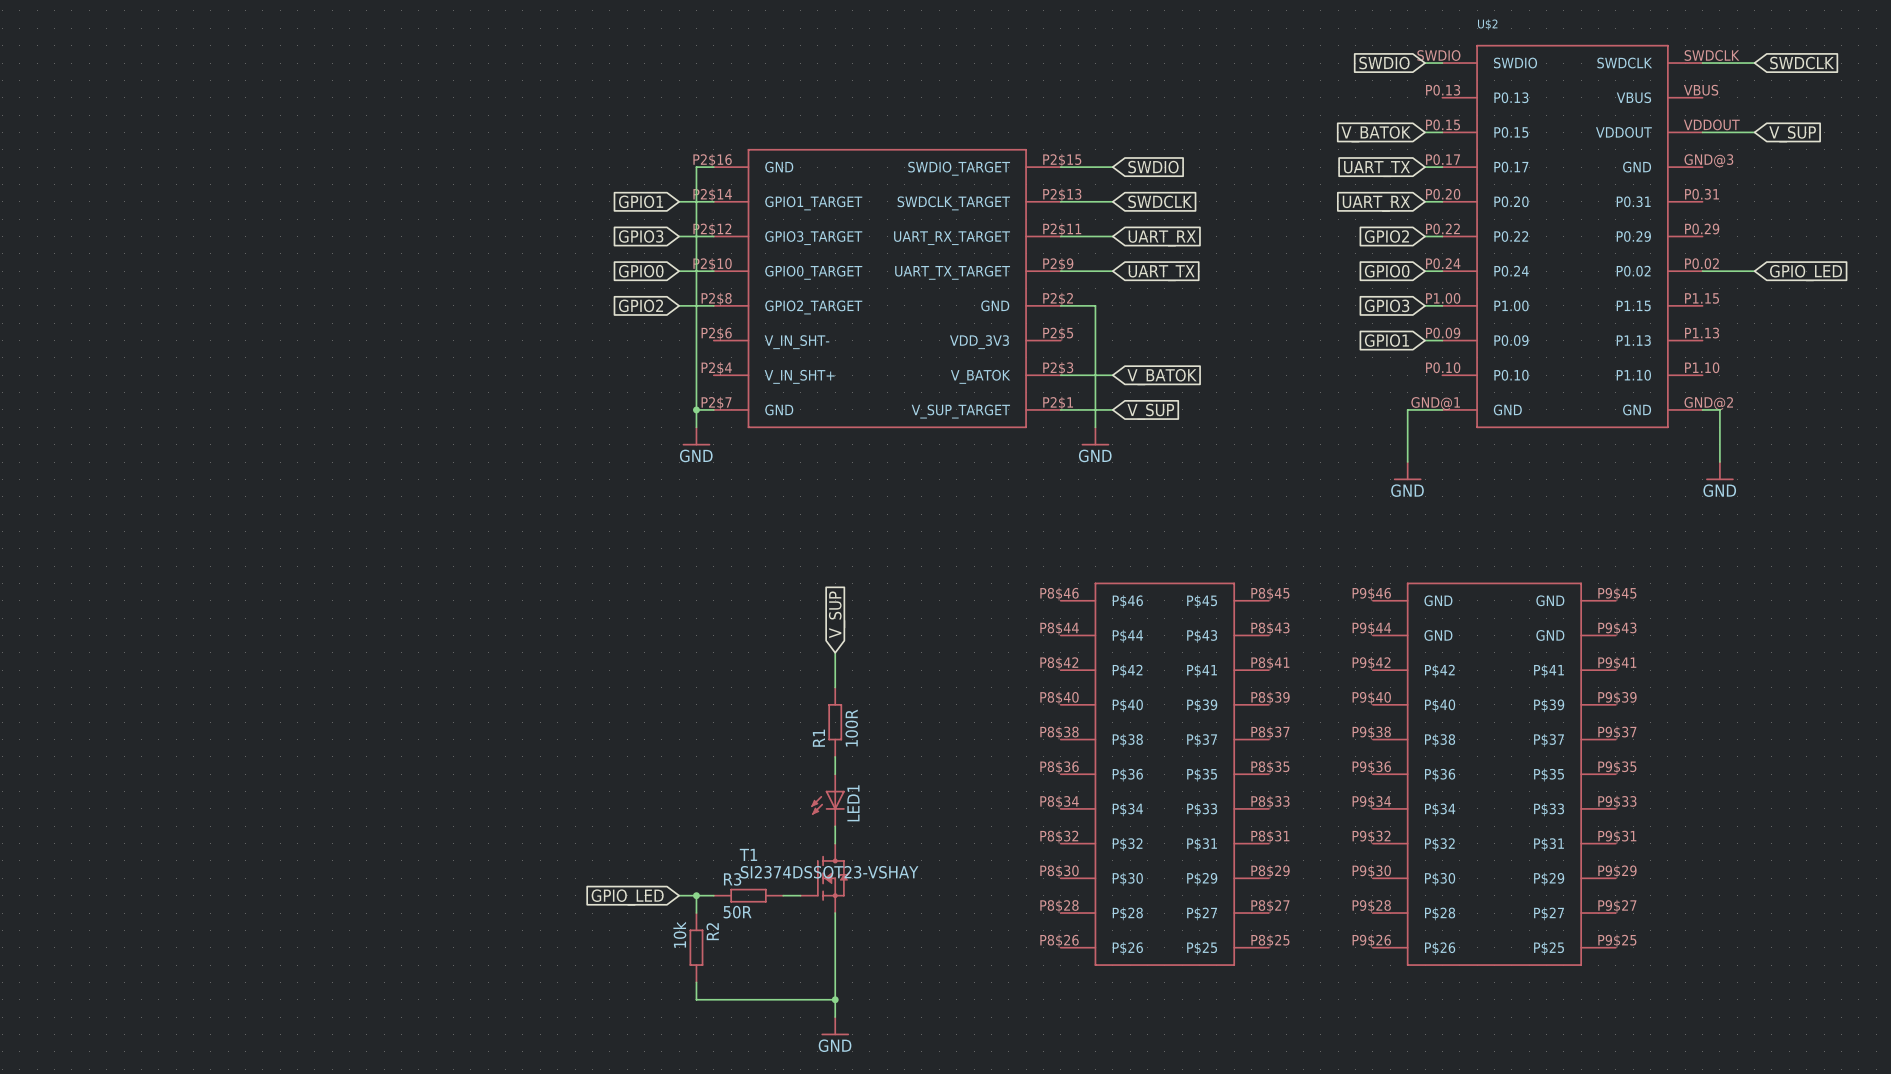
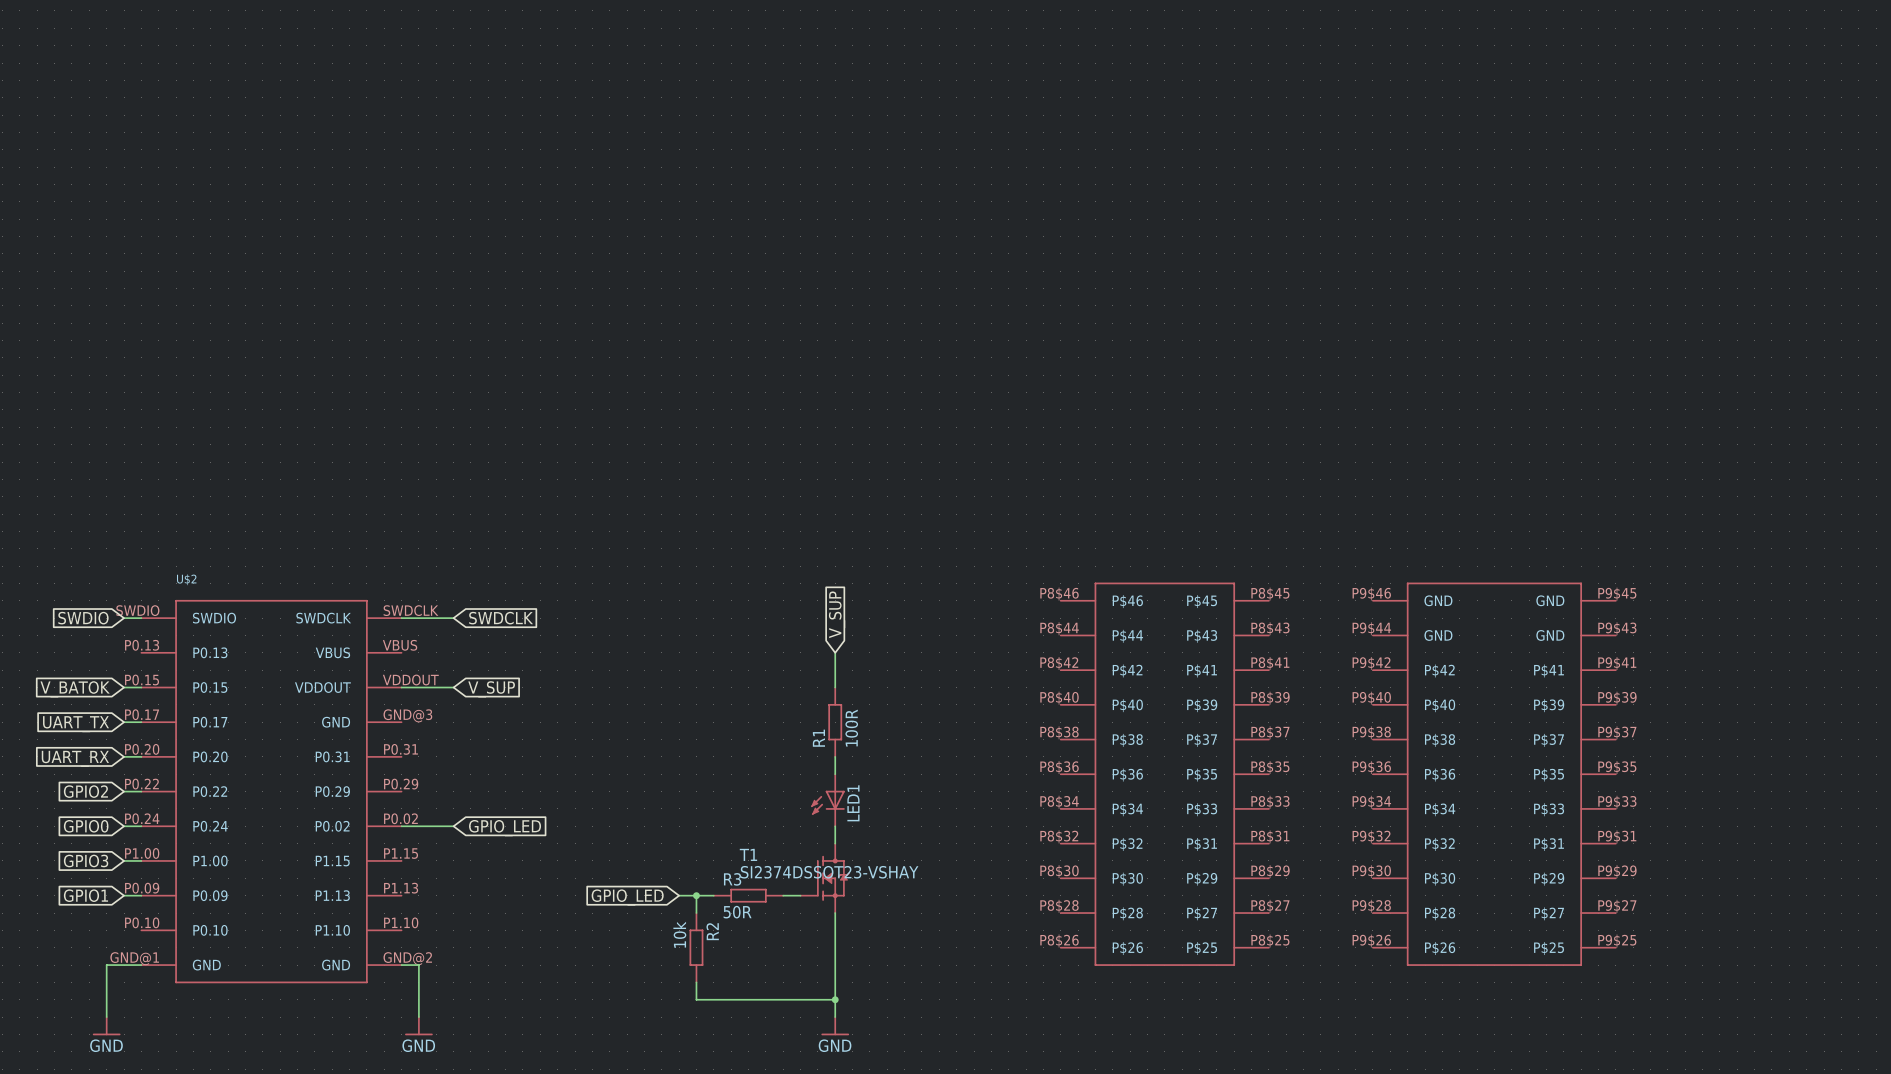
global label: SWDIO (1384, 63) -> none
wire: (1425, 63) (1442, 63) -> none
wire: (1702, 63) (1754, 63) -> none
global label: SWDCLK (1802, 63) -> none
wire: (1425, 132) (1442, 132) -> none
wire: (1702, 132) (1754, 132) -> none
global label: V_BATOK (1376, 134) -> none
global label: V_SUP (1792, 134) -> none
wire: (713, 167) (696, 167) (696, 427) -> none
wire: (1060, 167) (1112, 167) -> none
global label: SWDIO (1153, 167) -> none
wire: (1425, 167) (1442, 167) -> none
global label: UART_TX (1377, 169) -> none
global label: GPIO1 (641, 201) -> none
wire: (679, 201) (713, 201) -> none
wire: (1060, 201) (1112, 201) -> none
global label: SWDCLK (1160, 201) -> none
wire: (1425, 201) (1442, 201) -> none
global label: UART_RX (1376, 203) -> none
global label: GPIO3 (641, 236) -> none
wire: (679, 236) (713, 236) -> none
wire: (1060, 236) (1112, 236) -> none
global label: GPIO2 (1386, 236) -> none
wire: (1425, 236) (1442, 236) -> none
U$2 position: (1572, 236) -> (271, 791)
global label: UART_RX (1162, 238) -> none
global label: GPIO0 (641, 271) -> none
wire: (679, 271) (713, 271) -> none
wire: (1060, 271) (1112, 271) -> none
global label: GPIO0 (1387, 271) -> none
wire: (1425, 271) (1442, 271) -> none
wire: (1702, 271) (1754, 271) -> none
global label: UART_TX (1161, 273) -> none
global label: GPIO_LED (1806, 273) -> none
part: (887, 288) -> none
global label: GPIO2 (641, 305) -> none
wire: (679, 305) (713, 305) -> none
wire: (1060, 305) (1095, 305) (1095, 427) -> none
global label: GPIO3 (1387, 305) -> none
wire: (1425, 305) (1442, 305) -> none
global label: GPIO1 (1386, 340) -> none
wire: (1425, 340) (1442, 340) -> none
wire: (1060, 375) (1112, 375) -> none
global label: V_BATOK (1162, 377) -> none
wire: (696, 409) (713, 409) -> none
junction: (696, 409) -> none
wire: (1060, 409) (1112, 409) -> none
wire: (1442, 409) (1407, 409) (1407, 462) -> none
wire: (1702, 409) (1719, 409) (1719, 462) -> none
global label: V_SUP (1150, 411) -> none
power symbol: GND (696, 436) -> none
power symbol: GND (1095, 436) -> none
power symbol: GND (1407, 471) -> none
power symbol: GND (1719, 471) -> none
global label: none -> SWDIO (83, 618)
wire: none -> (124, 618) (141, 618)
wire: none -> (401, 618) (453, 618)
global label: none -> SWDCLK (501, 618)
wire: none -> (124, 687) (141, 687)
wire: none -> (401, 687) (453, 687)
global label: none -> V_BATOK (75, 689)
global label: none -> V_SUP (491, 689)
wire: none -> (124, 722) (141, 722)
global label: none -> UART_TX (76, 724)
wire: none -> (124, 756) (141, 756)
global label: none -> UART_RX (75, 758)
global label: none -> GPIO2 (85, 791)
wire: none -> (124, 791) (141, 791)
global label: none -> GPIO0 (86, 826)
wire: none -> (124, 826) (141, 826)
wire: none -> (401, 826) (453, 826)
global label: none -> GPIO_LED (505, 828)
global label: none -> GPIO3 (86, 860)
wire: none -> (124, 860) (141, 860)
global label: none -> GPIO1 (85, 895)
wire: none -> (124, 895) (141, 895)
wire: none -> (141, 965) (106, 965) (106, 1017)
wire: none -> (401, 965) (418, 965) (418, 1017)
power symbol: none -> GND (106, 1026)
power symbol: none -> GND (418, 1026)

